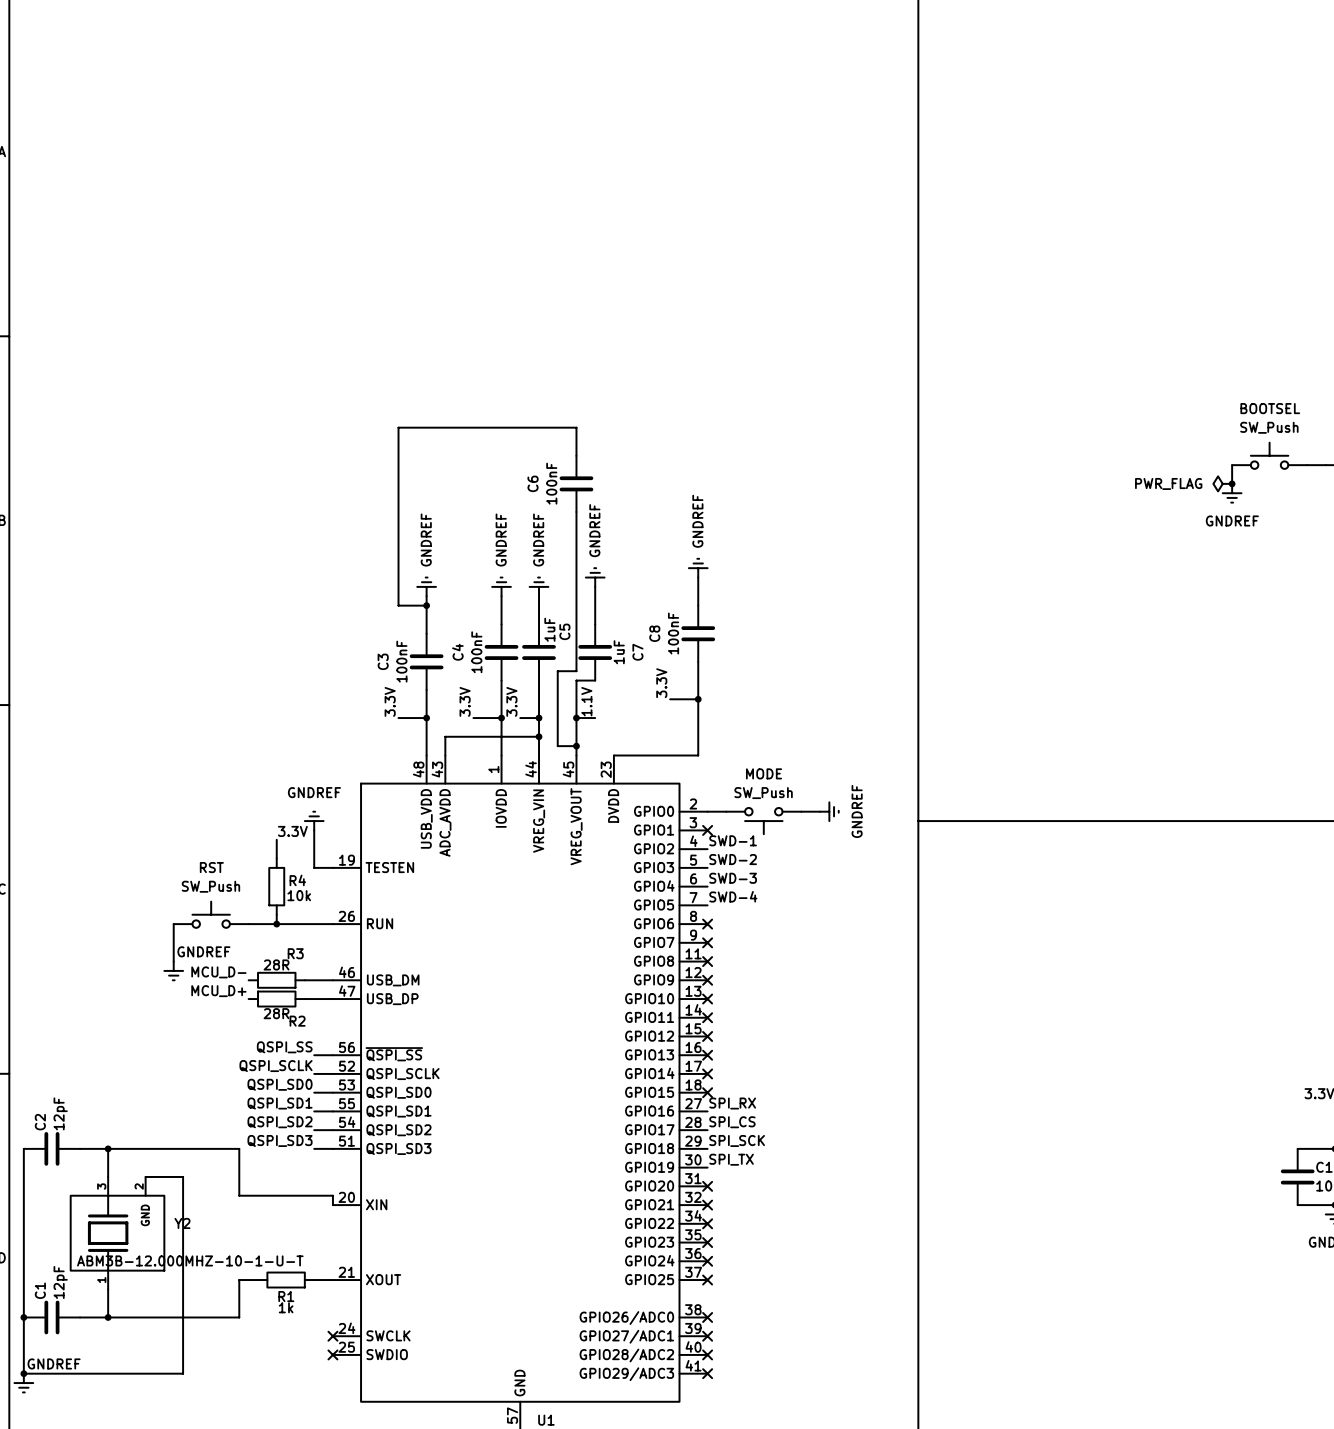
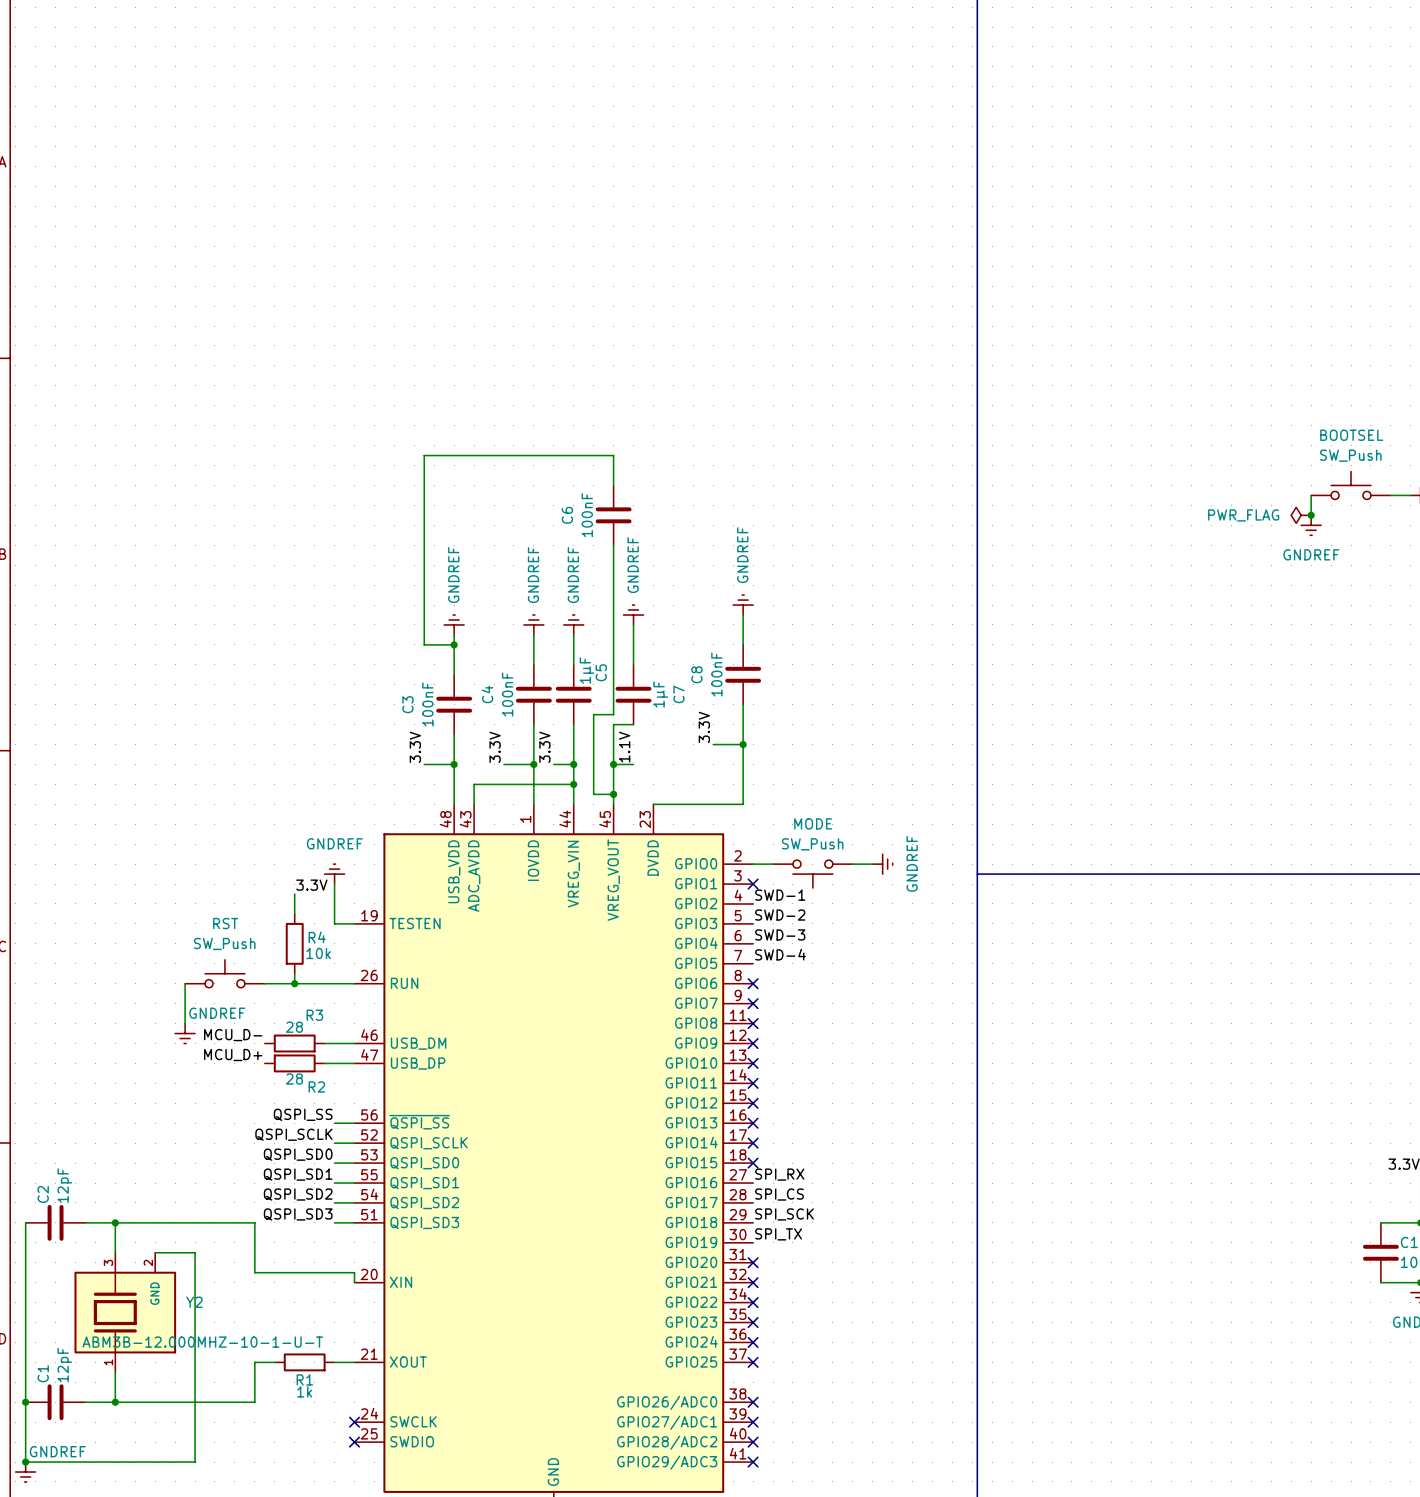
C5 value: 1uF (549, 629) -> 1μF (586, 670)
C7 value: 1uF (619, 652) -> 1μF (660, 694)
R3 value: 28R (276, 964) -> 28 (294, 1027)
R2 value: 28R (276, 1013) -> 28 (294, 1079)

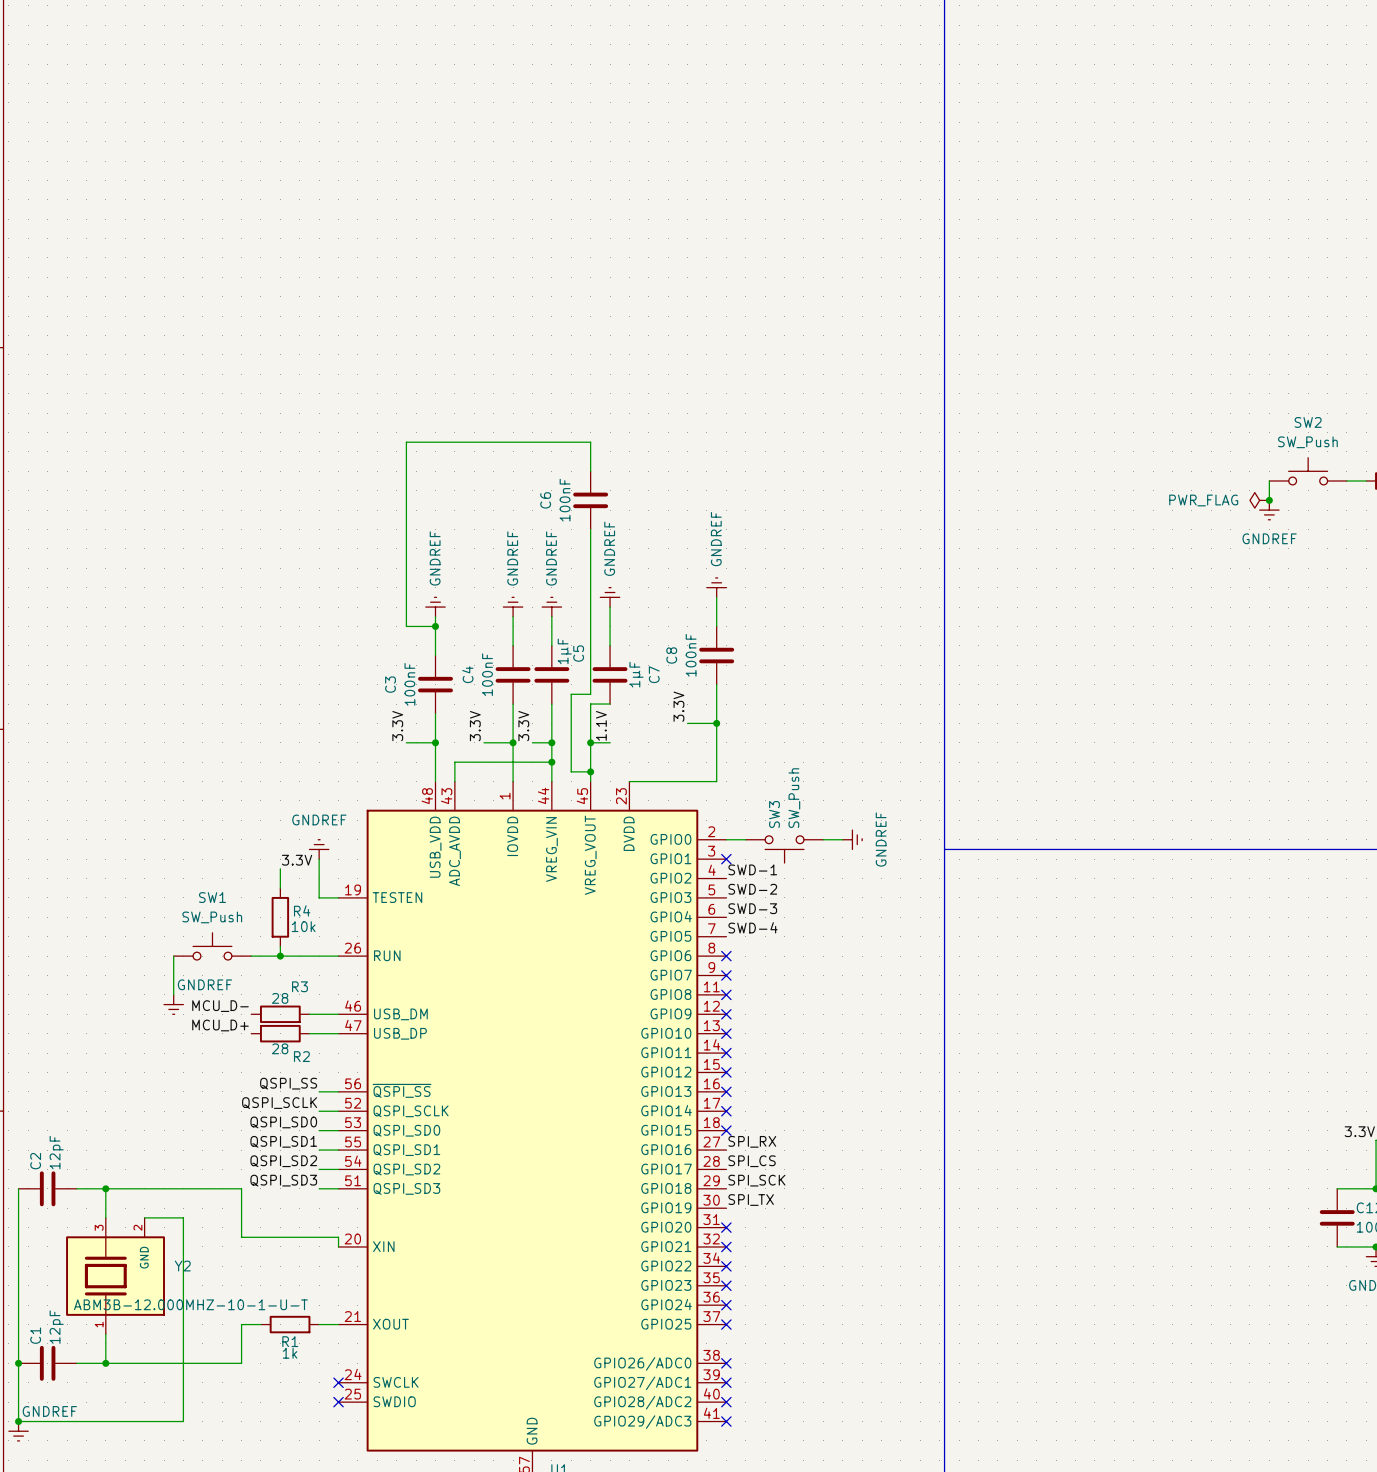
BOOTSEL name: BOOTSEL (1351, 435) -> SW2 (1308, 422)
MODE name: MODE (813, 823) -> SW3 (774, 814)
MODE value rotation: 0° (812, 844) -> 90° counterclockwise (794, 798)
RST name: RST (225, 923) -> SW1 (212, 897)

